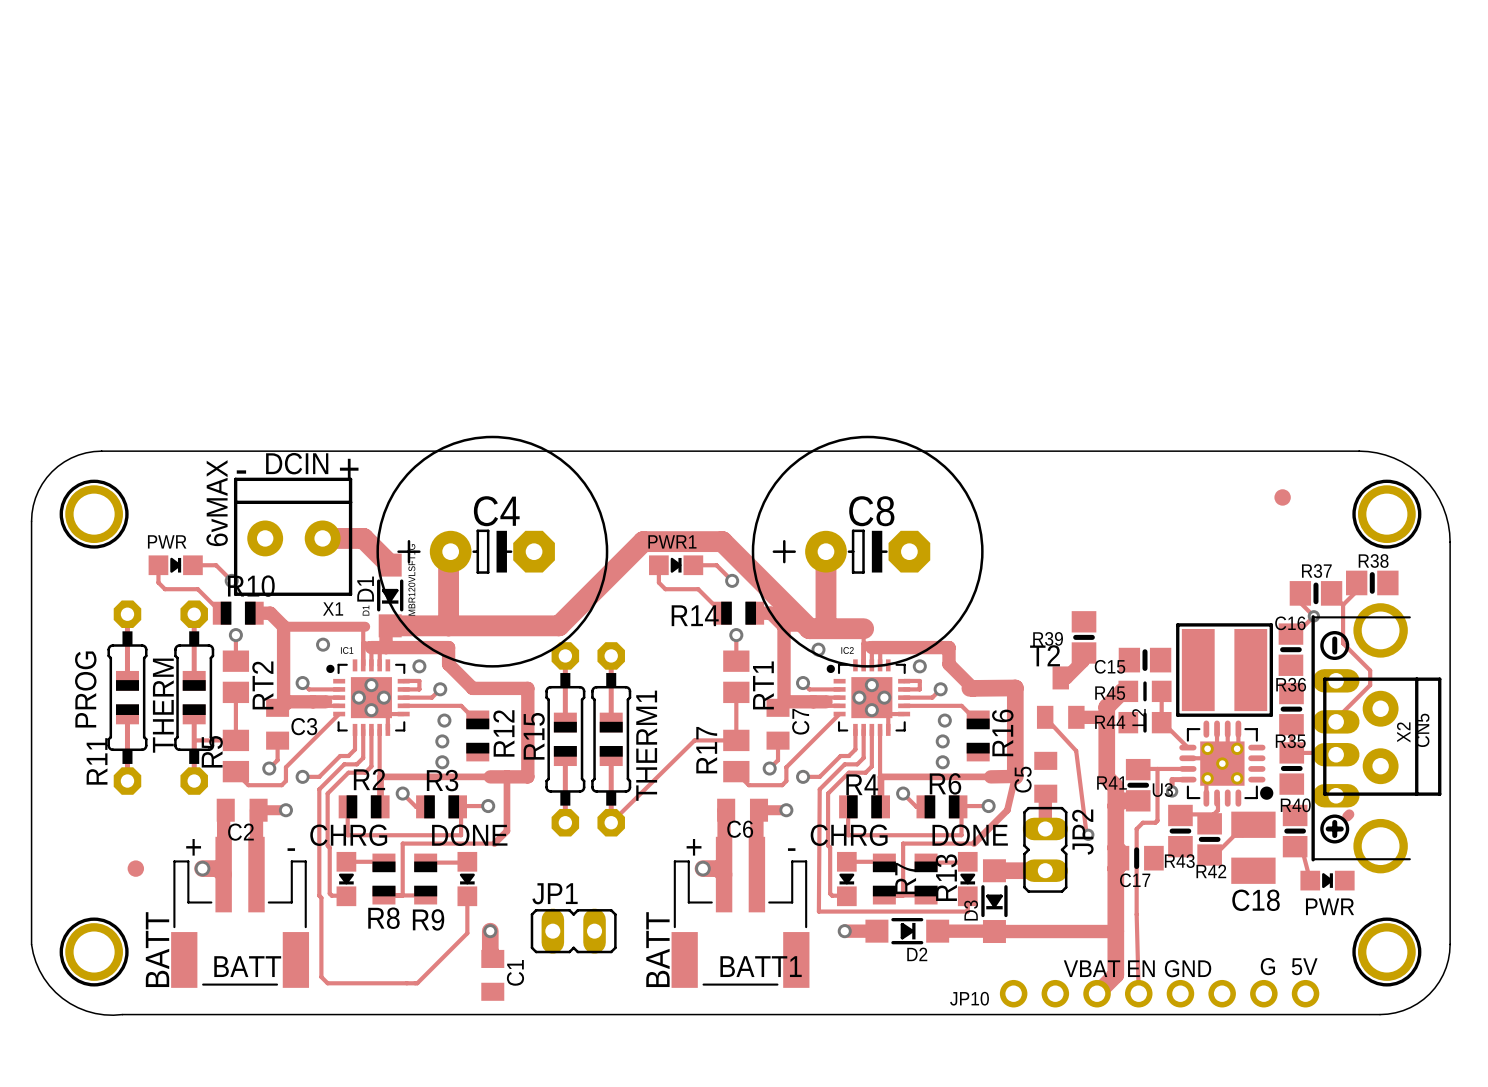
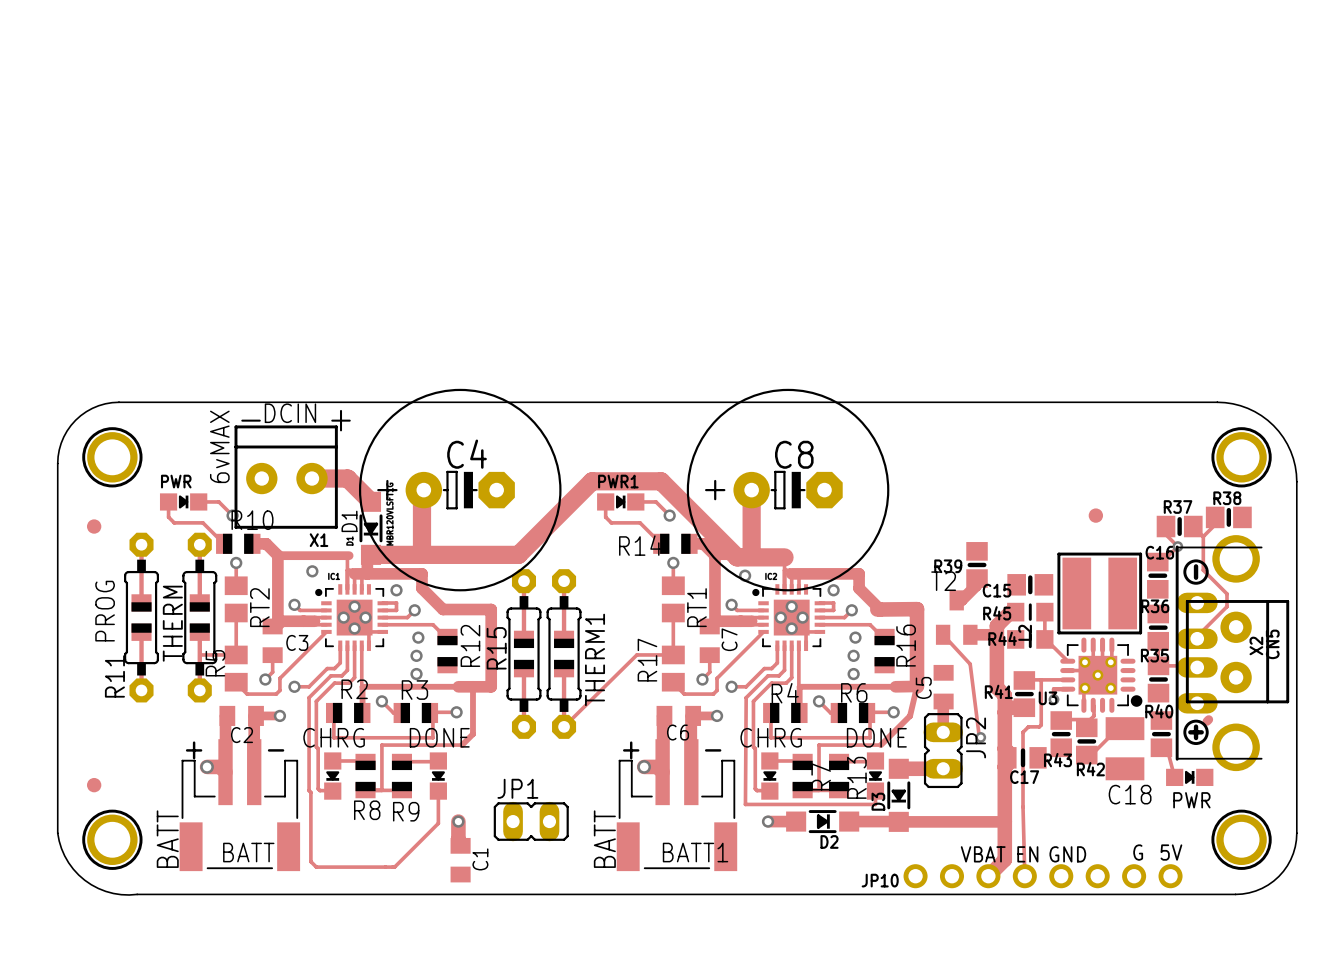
part position: (1282, 497) -> (1095, 515)
part: none -> (94, 526)
part position: (135, 868) -> (94, 785)

